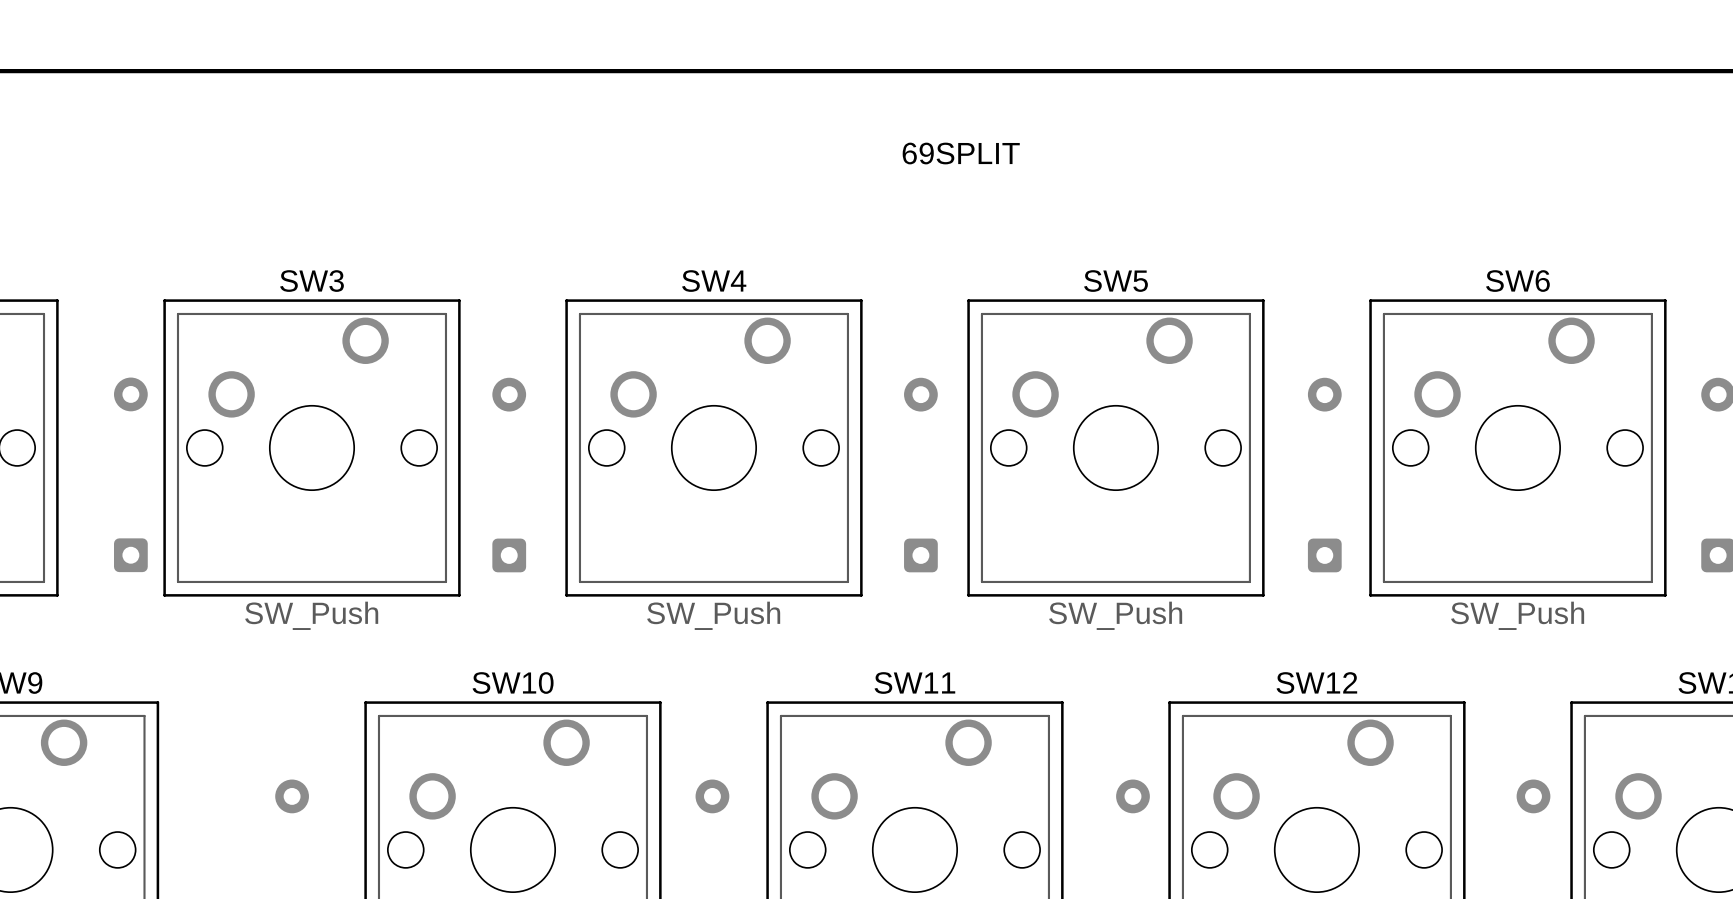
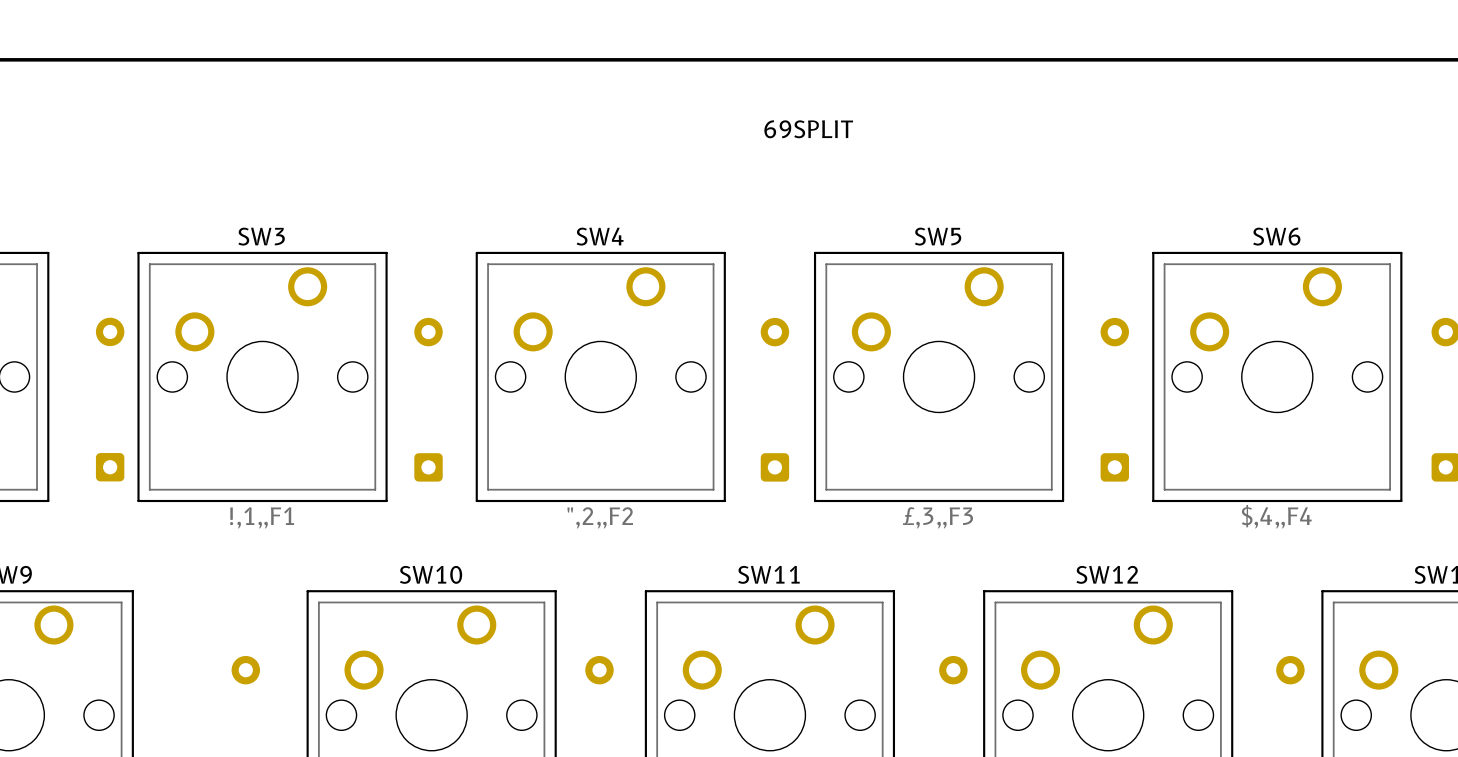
SW3 value: SW_Push (311, 615) -> !,1,,F1 (262, 517)
SW4 value: SW_Push (713, 615) -> ",2,,F2 (600, 517)
SW5 value: SW_Push (1115, 615) -> £,3,,F3 (937, 517)
SW6 value: SW_Push (1517, 615) -> $,4,,F4 (1276, 516)

